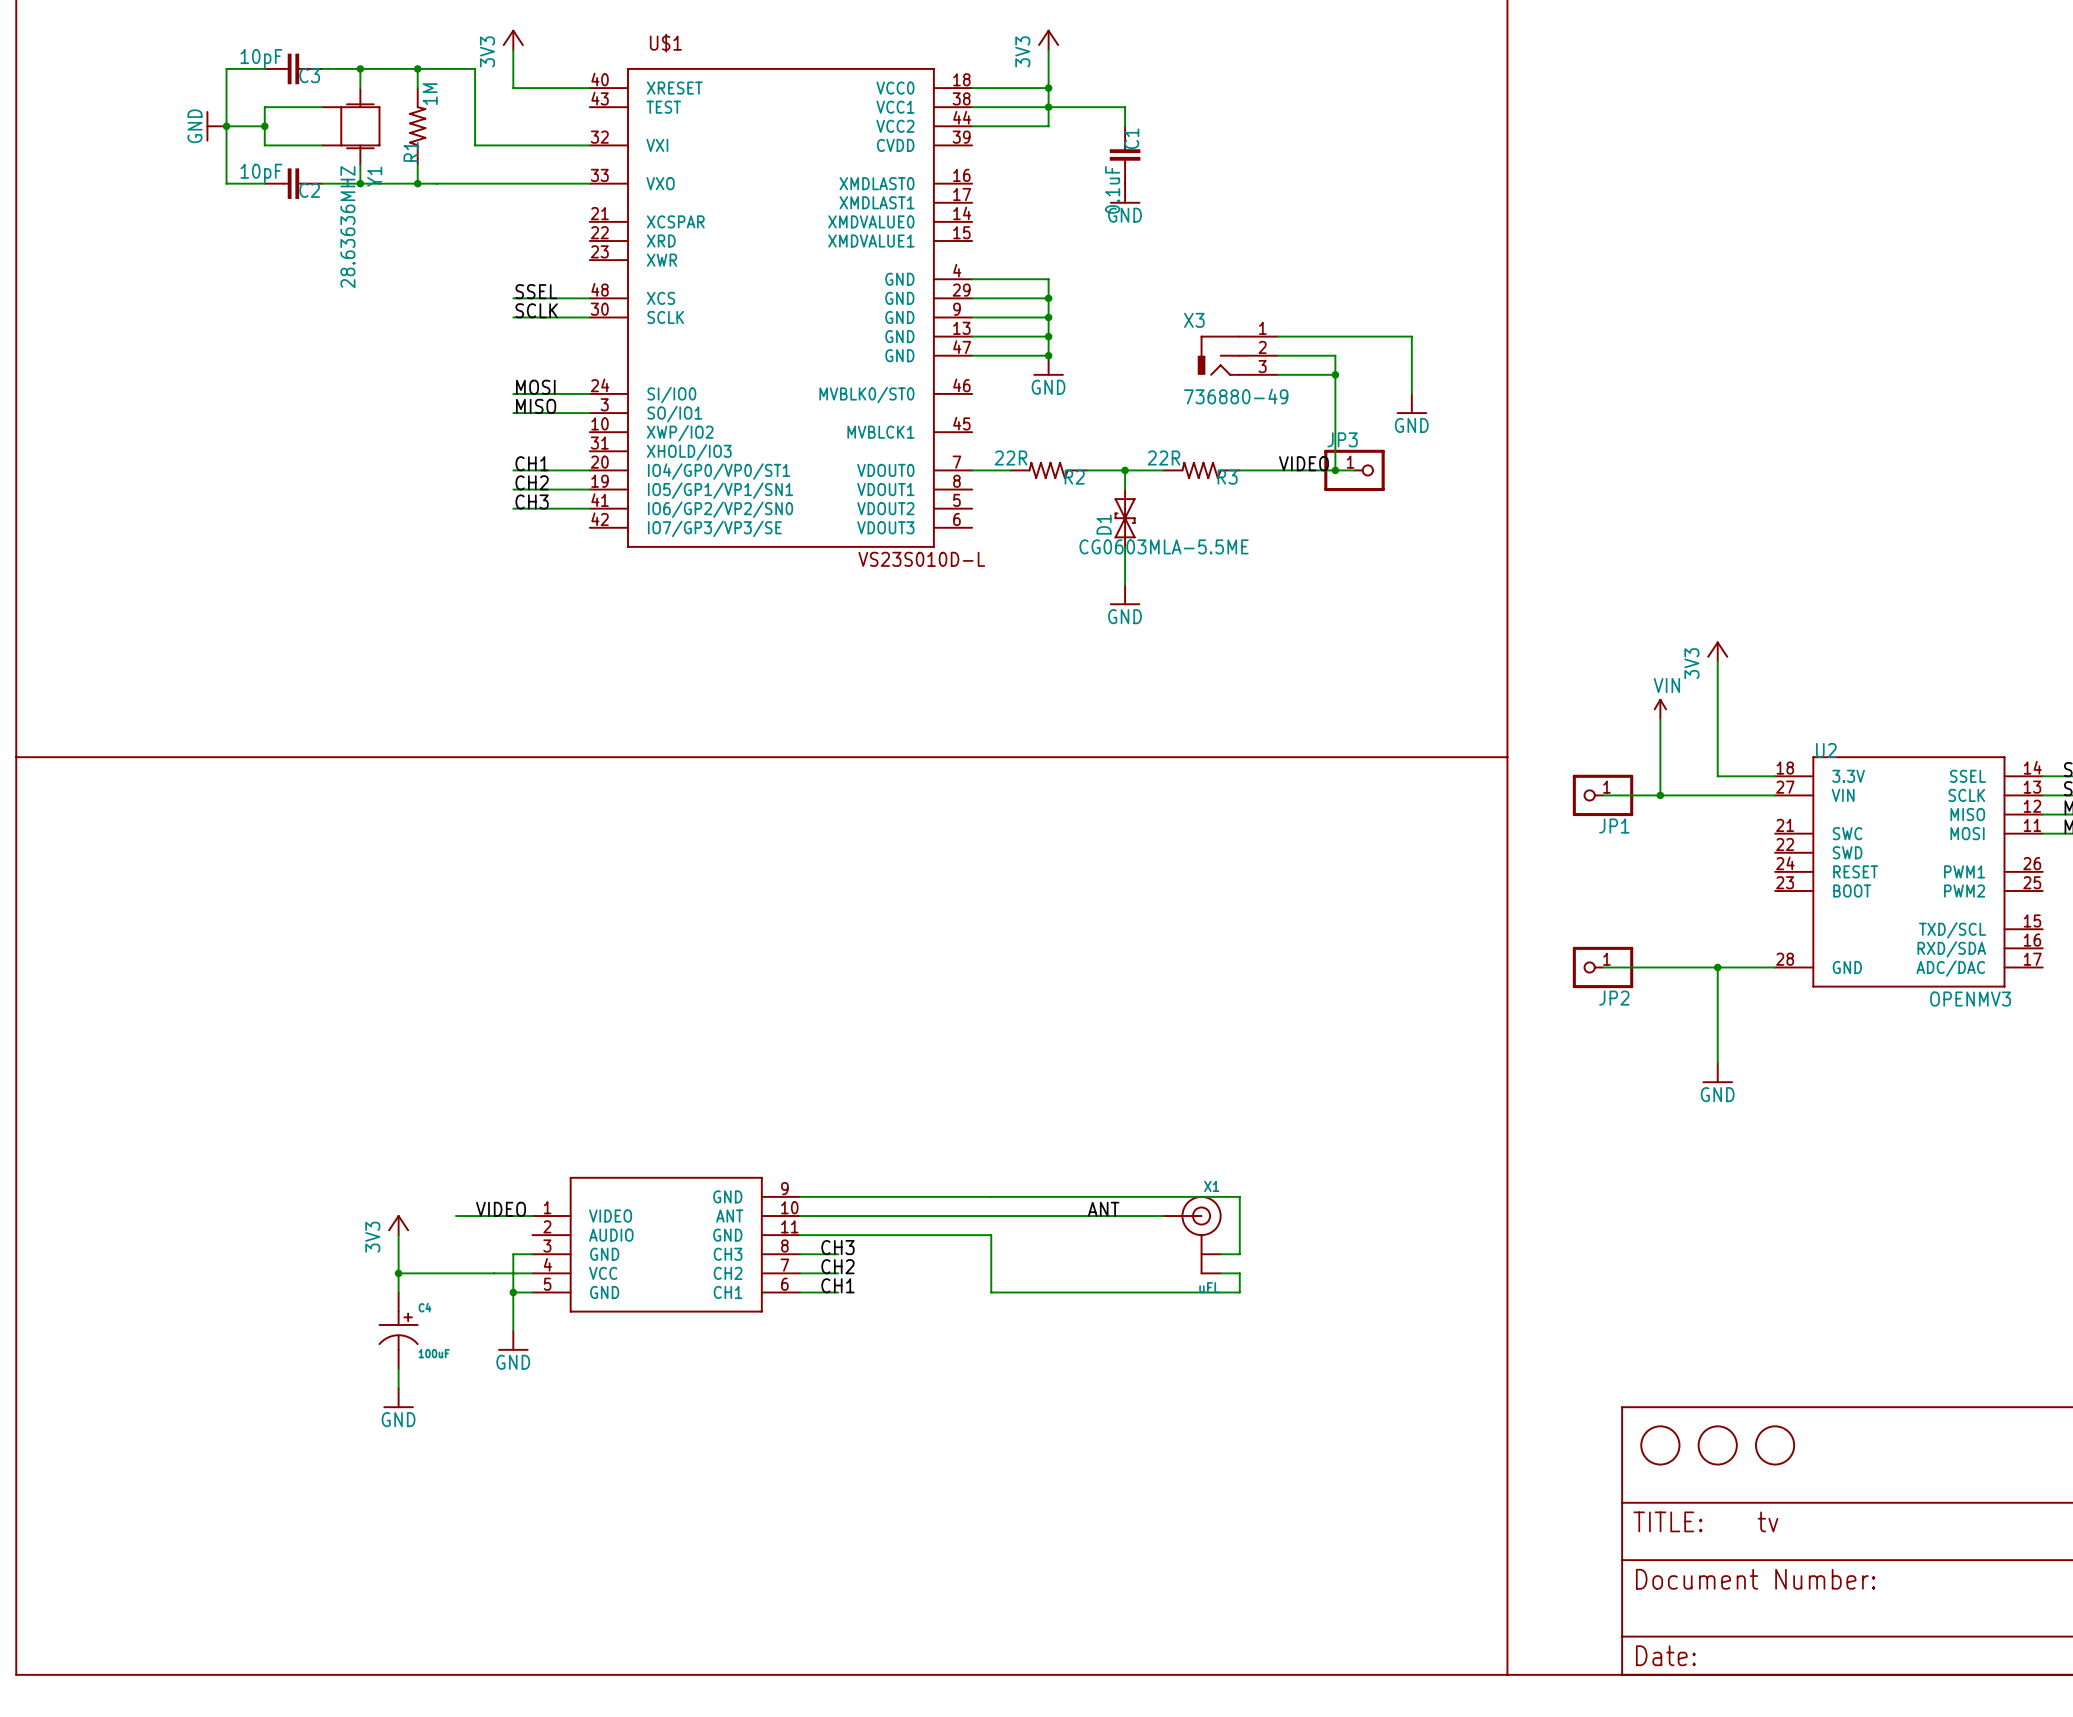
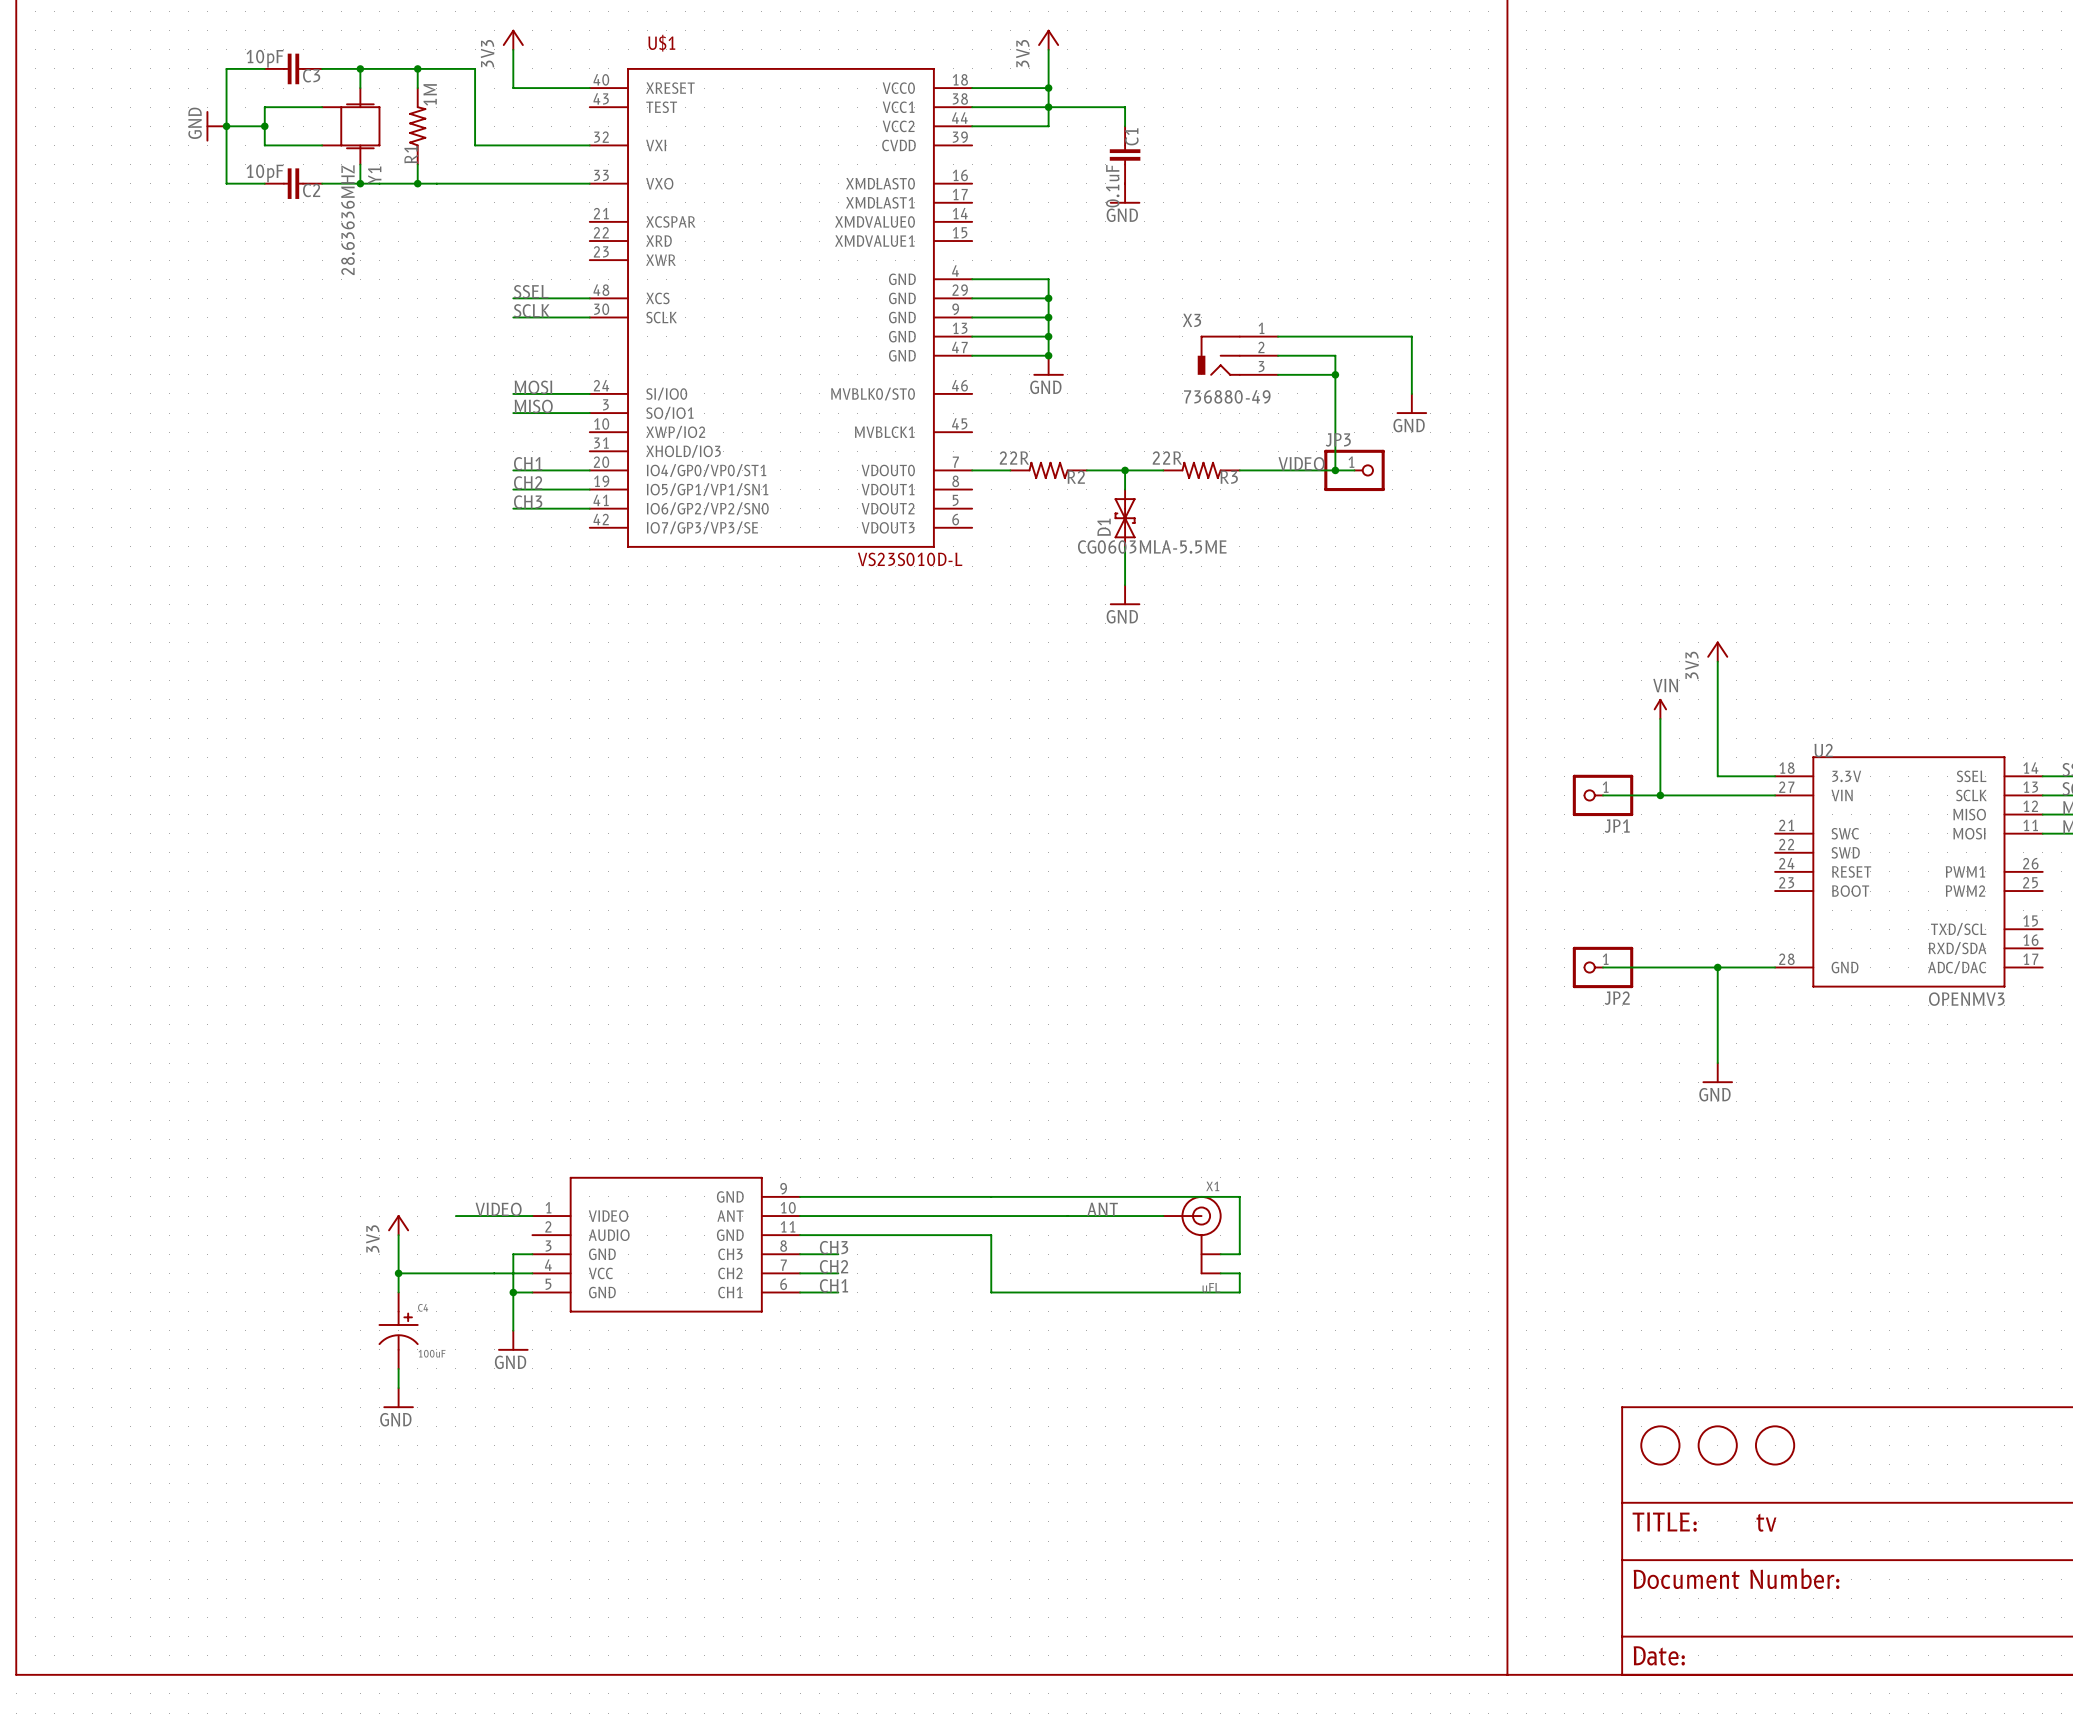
line: (16, 757) (1507, 757) -> none

